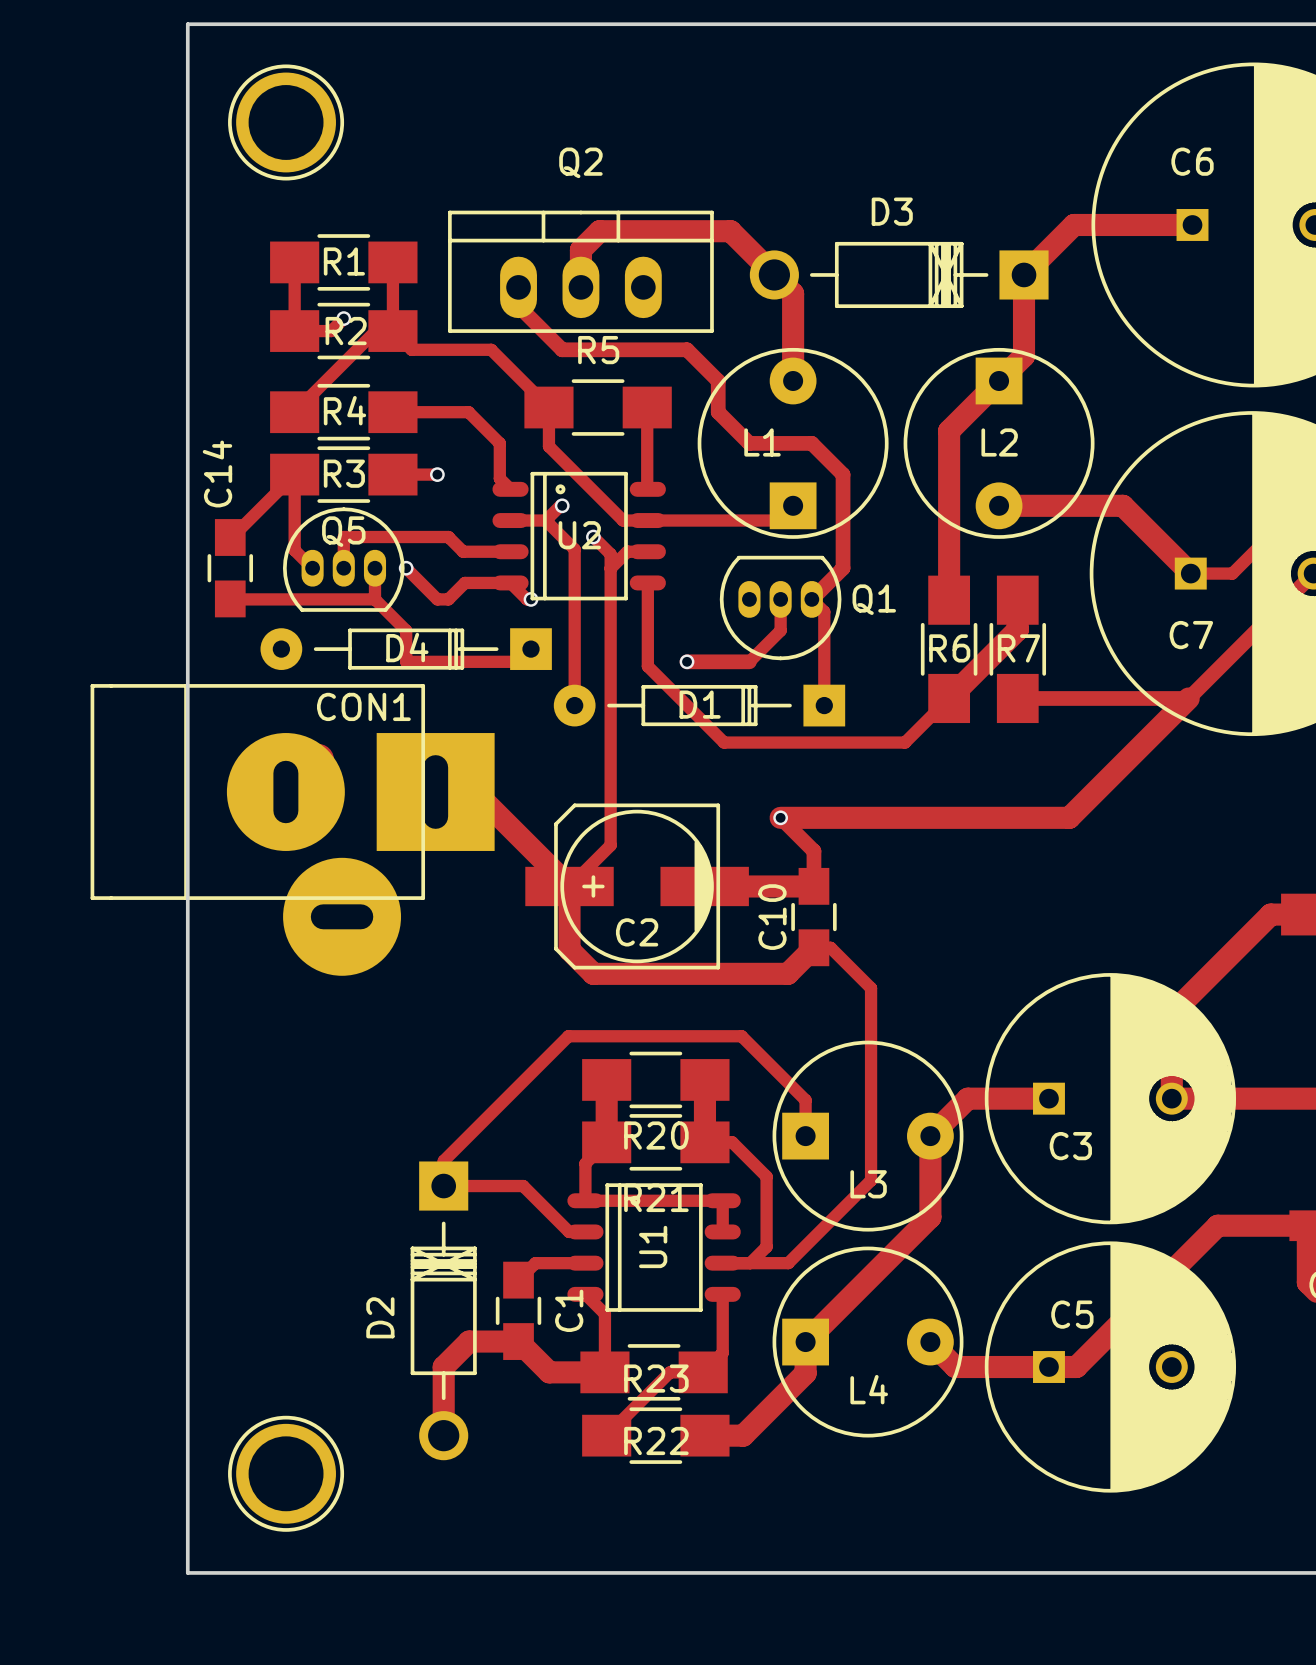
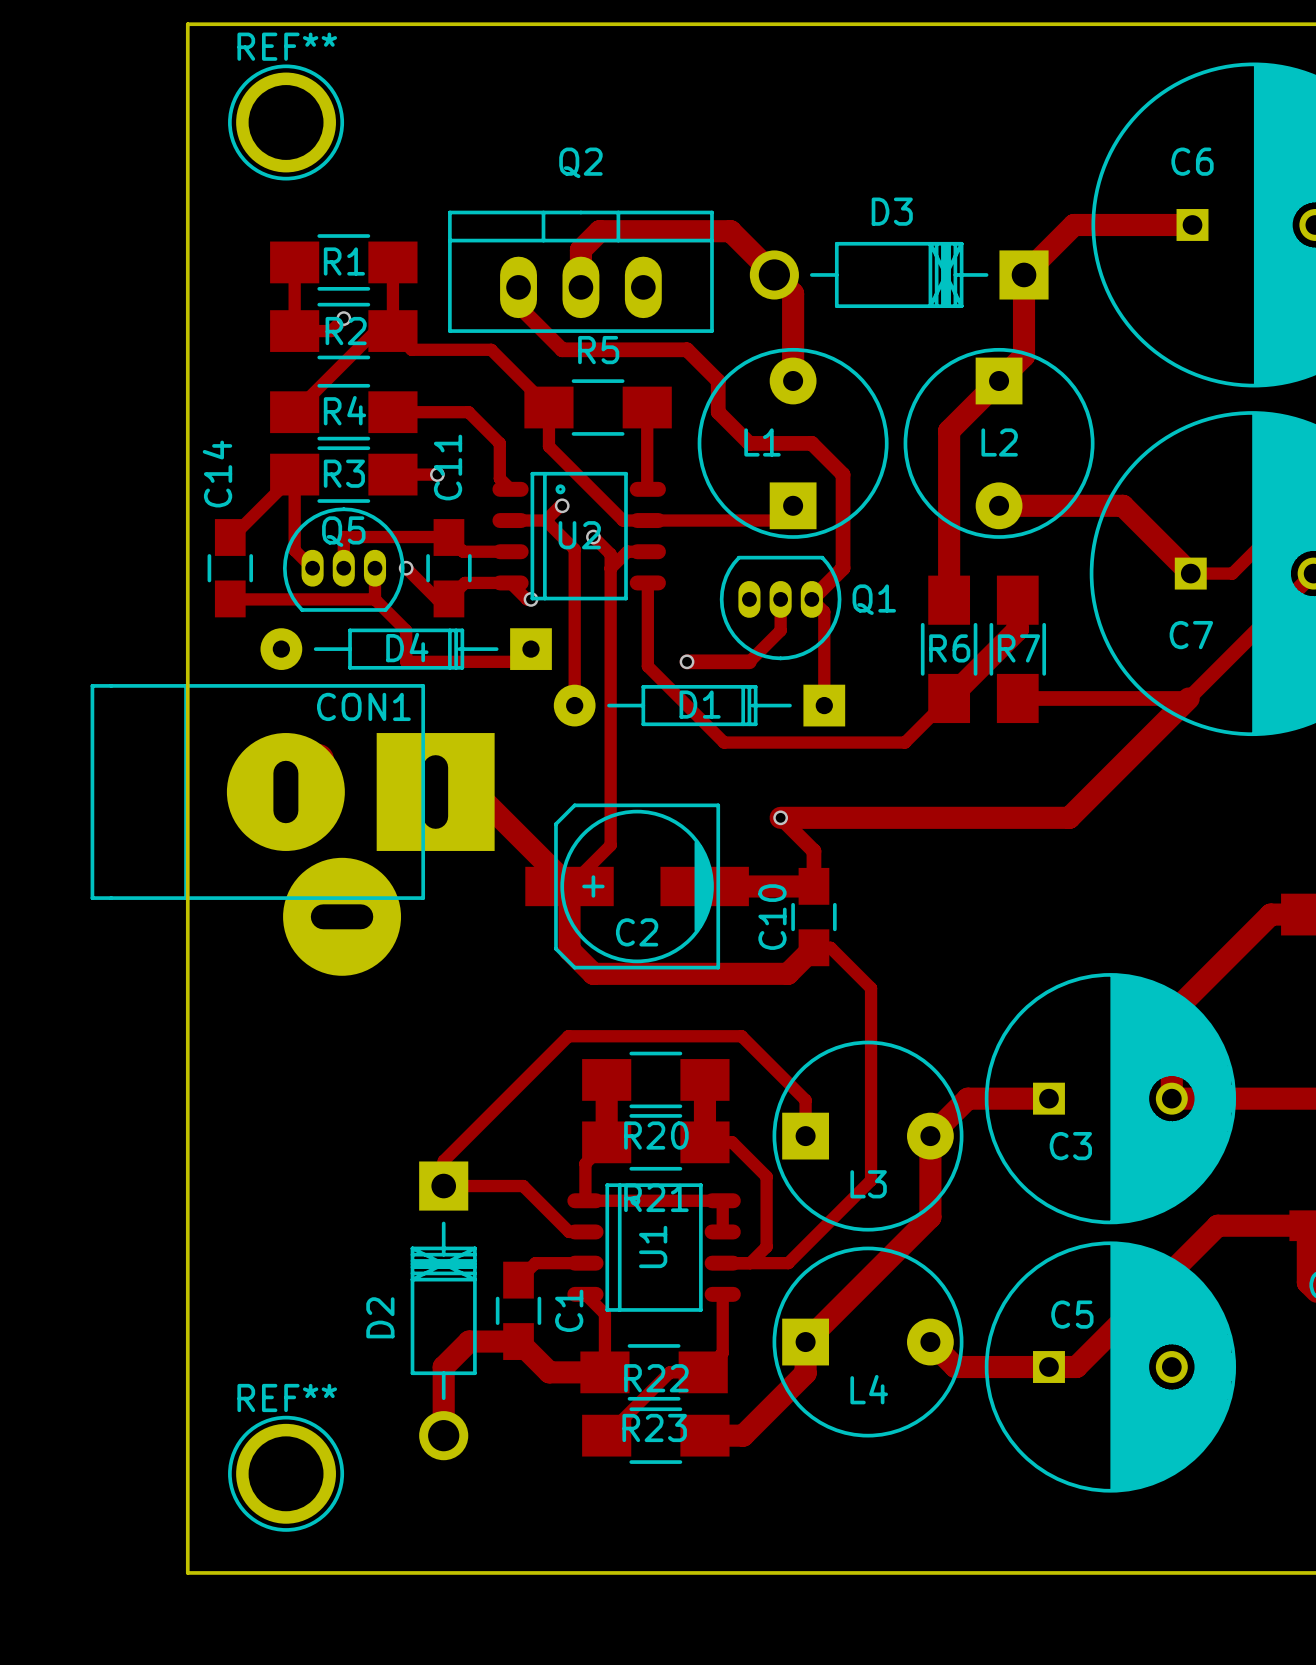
REF** name: none -> REF** (287, 46)
C11: none -> (448, 568)
R23 name position: R23 (656, 1378) -> R23 (654, 1427)
REF** name: none -> REF** (287, 1397)
R22 name position: R22 (656, 1440) -> R22 (656, 1378)

